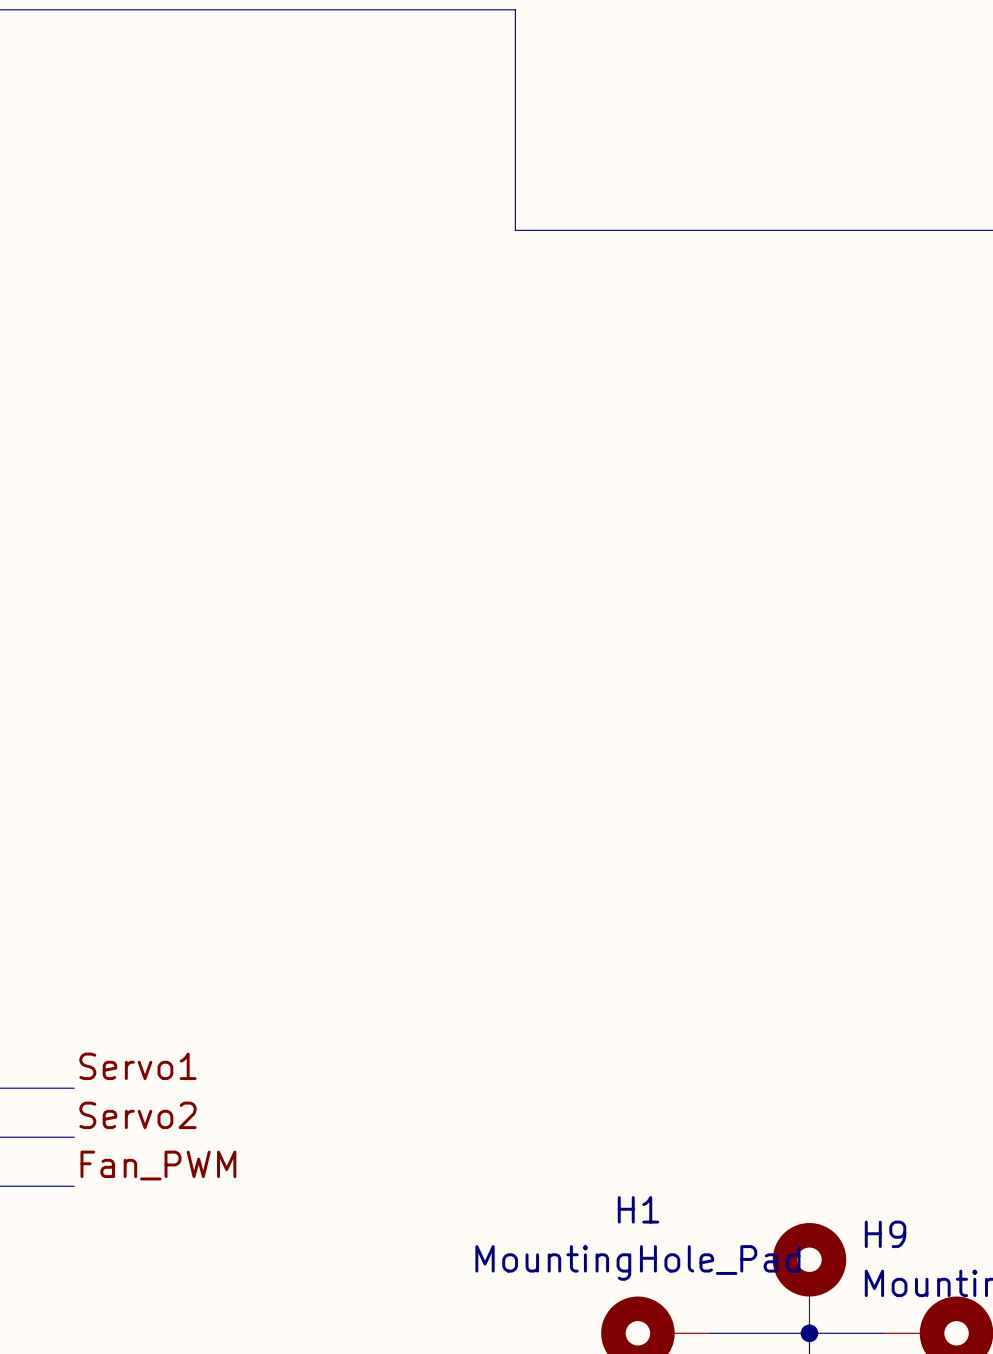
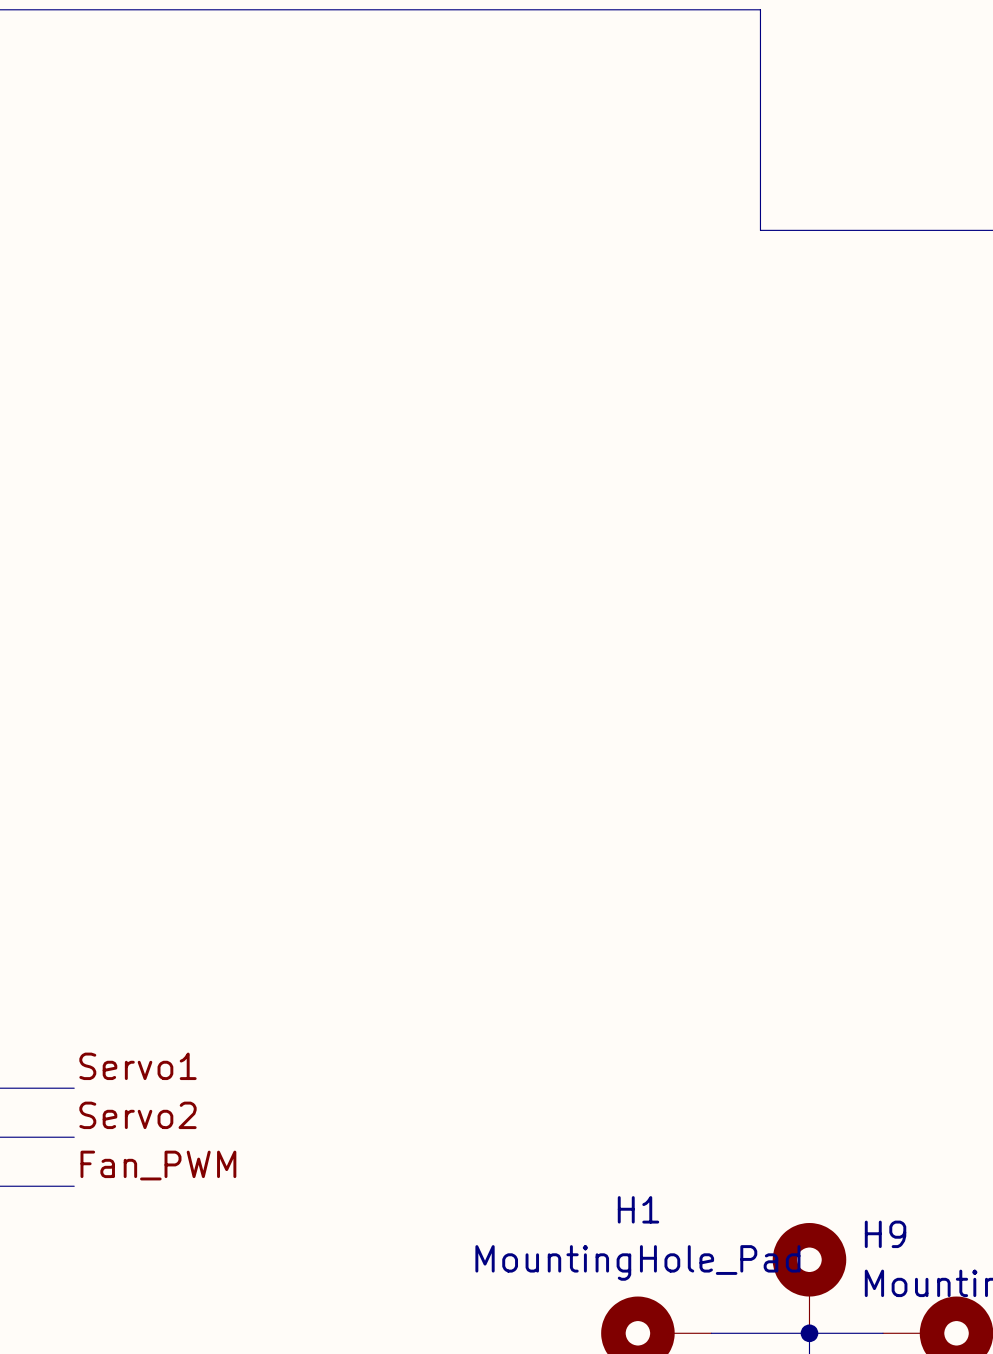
wire: (515, 9) (515, 230) (760, 230) -> (515, 9) (760, 9) (760, 230)

